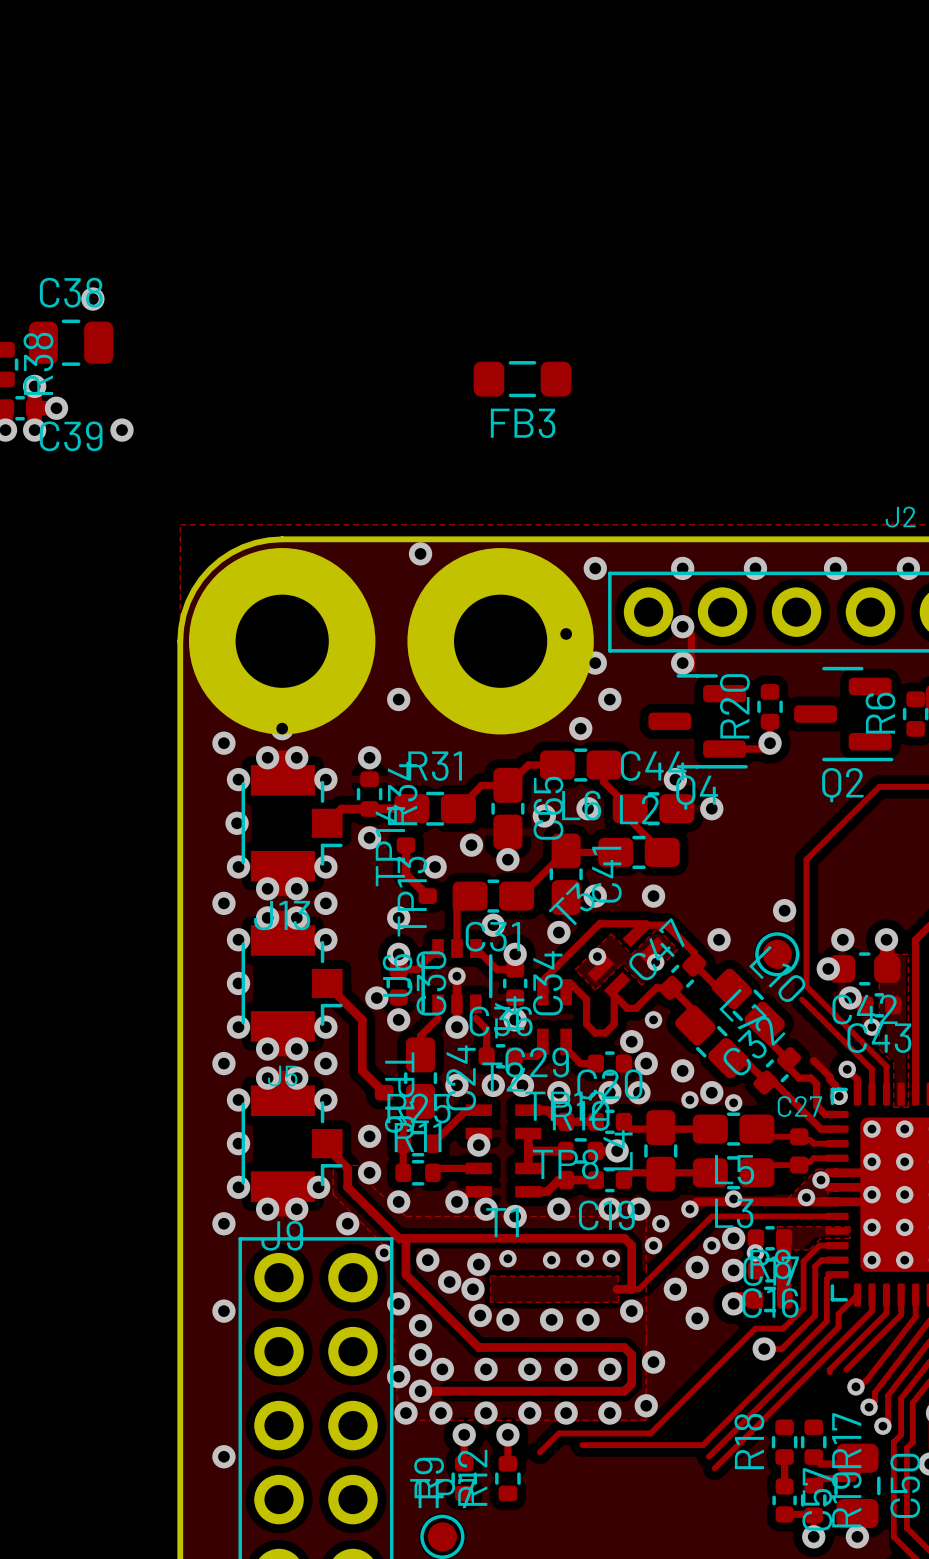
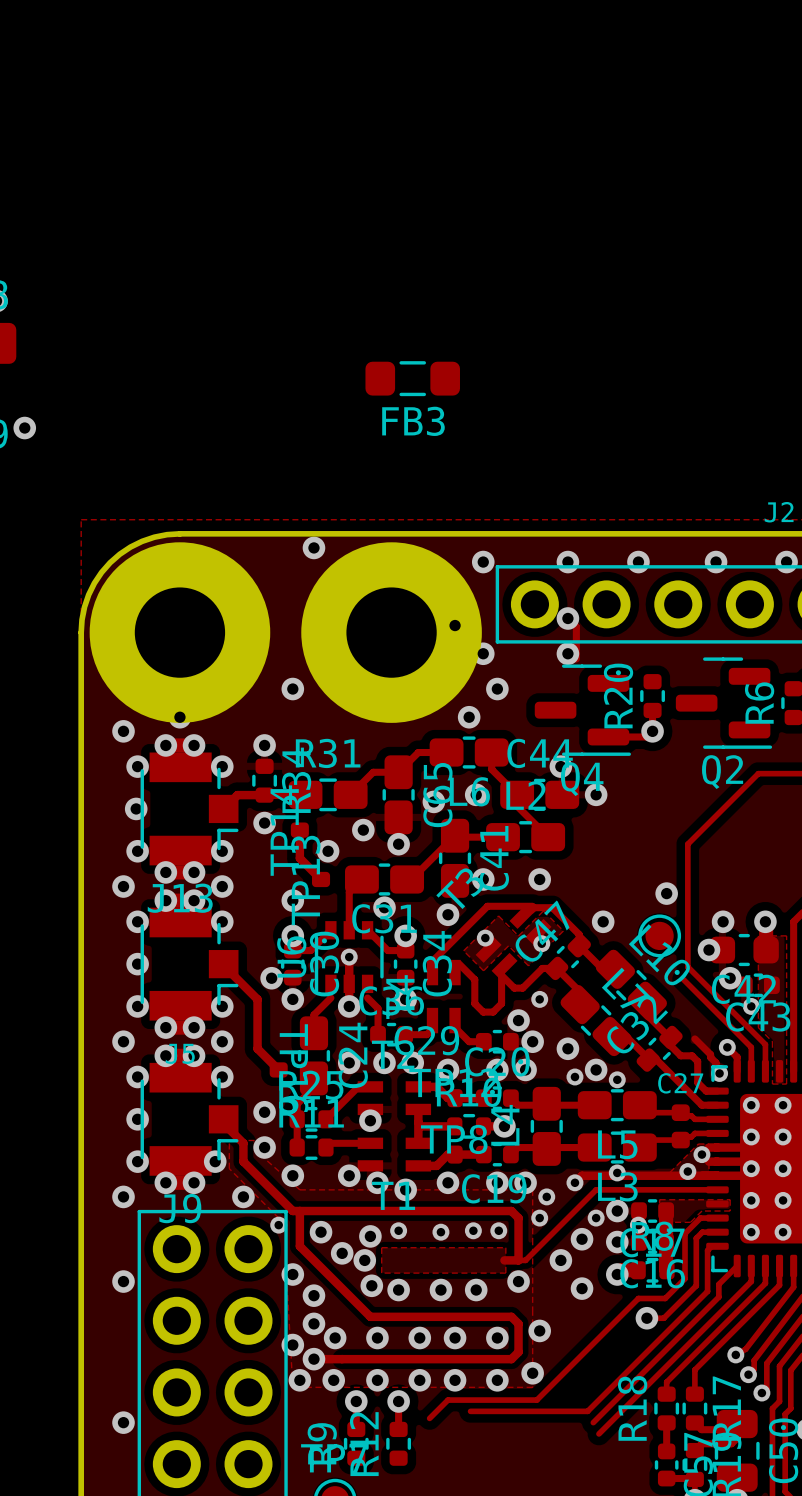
track: (829, 1369) (829, 1372) -> (710, 1338) (666, 1382) (666, 1394)
track: none -> (726, 1338) (694, 1369) (694, 1394)

